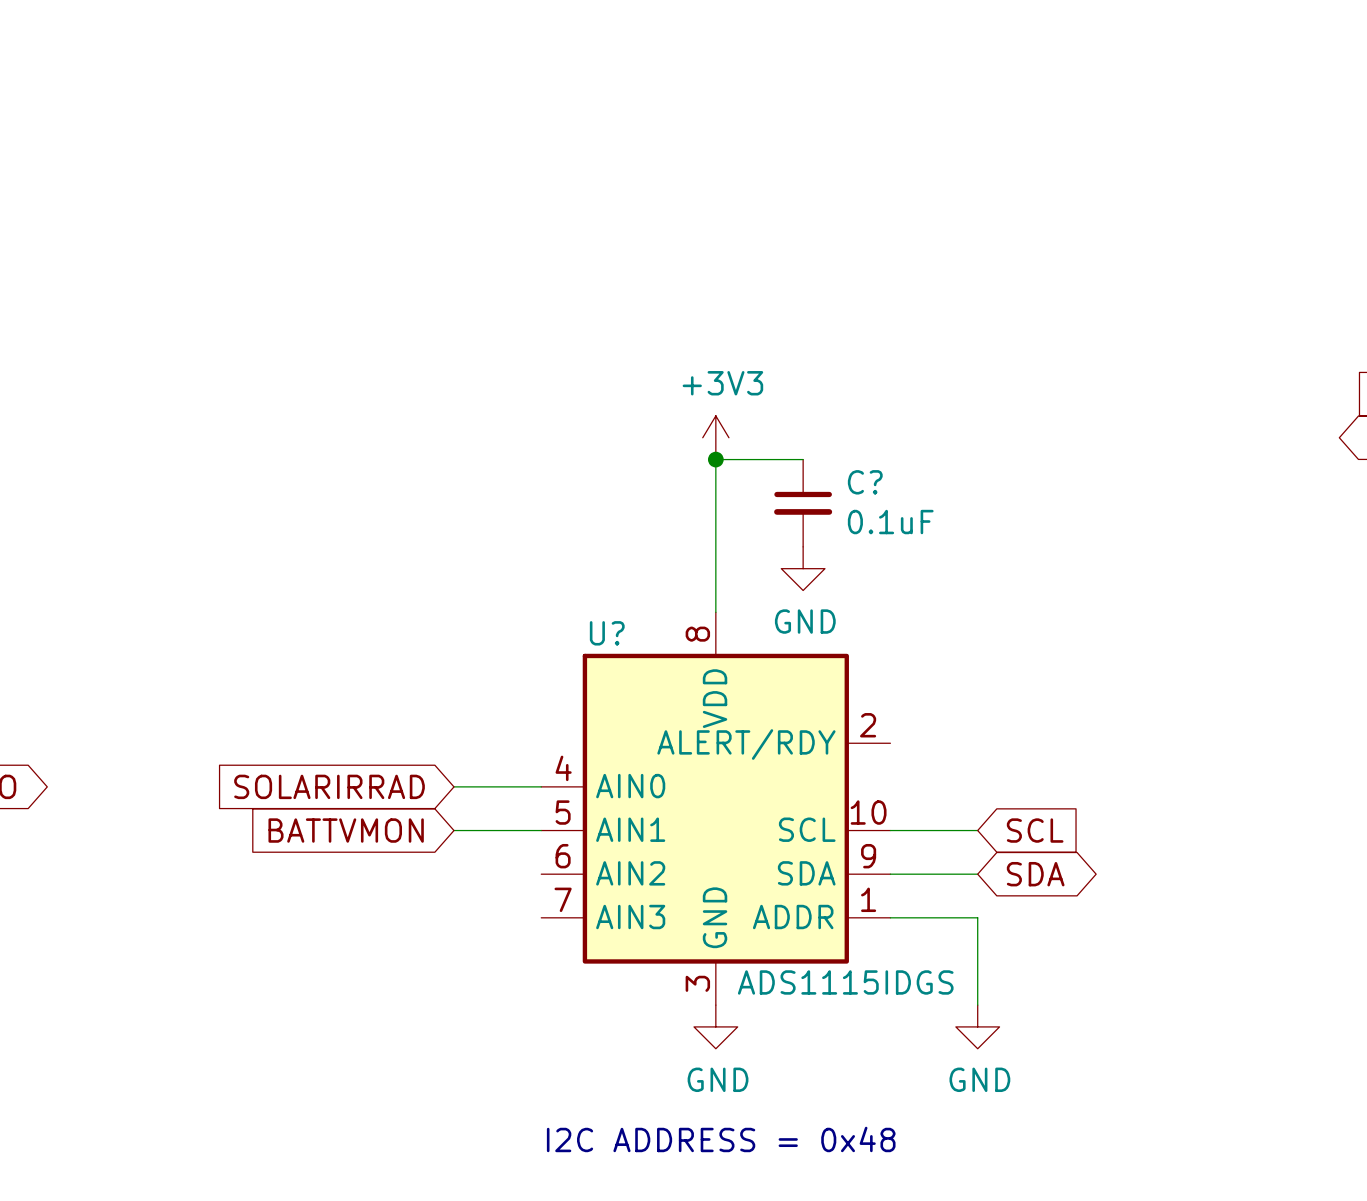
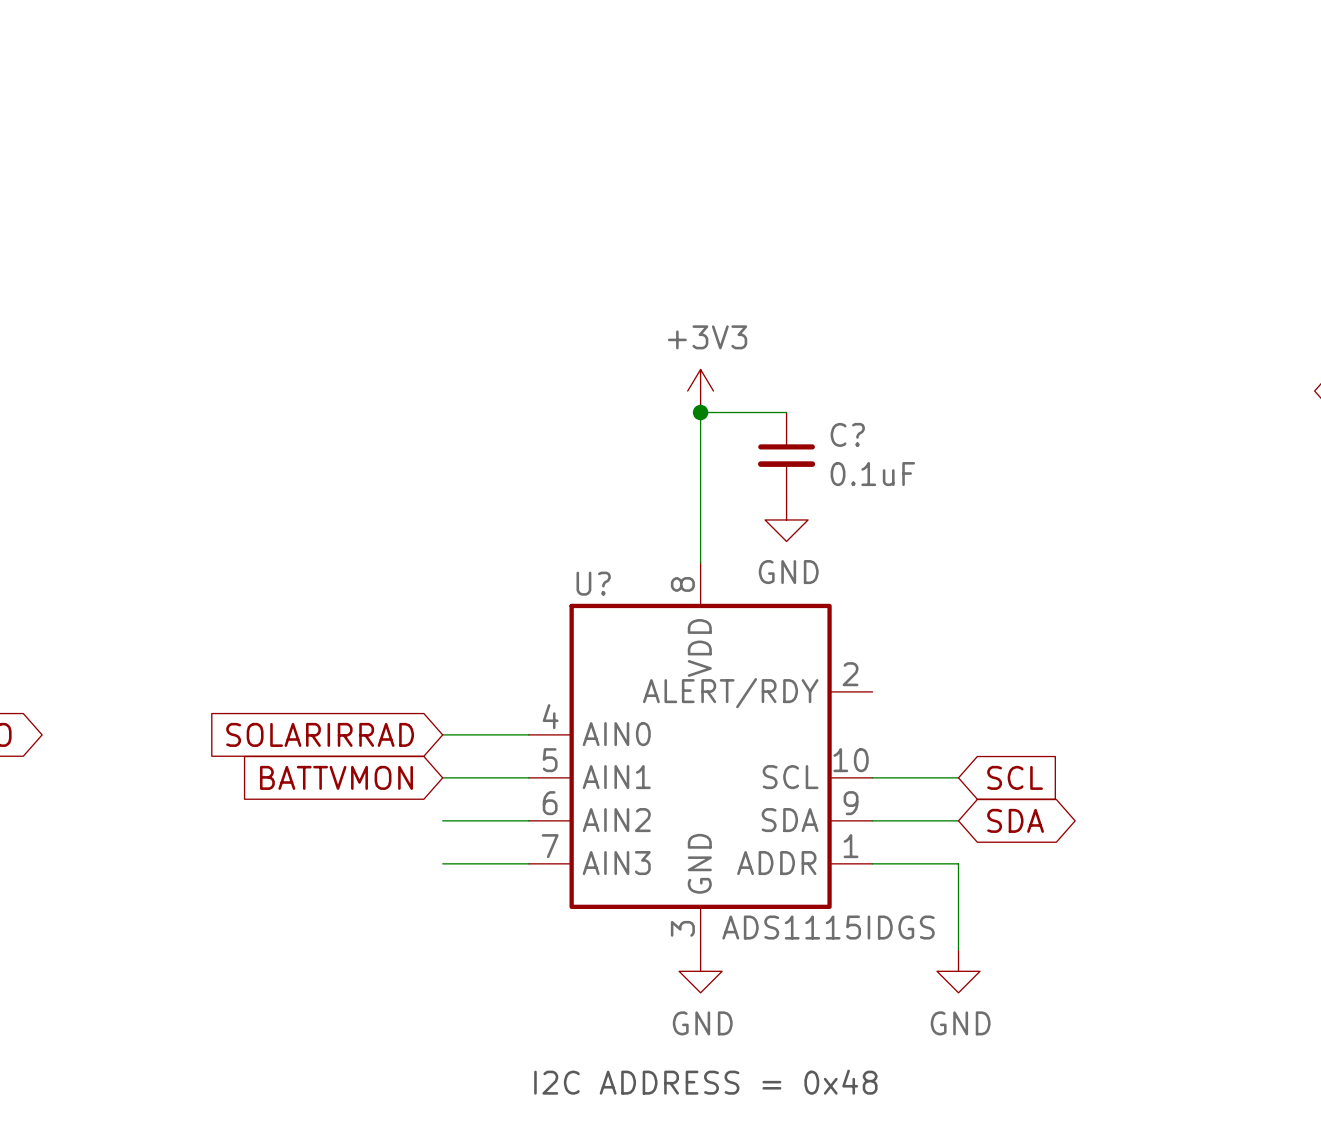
wire: none -> (442, 820) (528, 820)
wire: none -> (442, 863) (528, 863)

